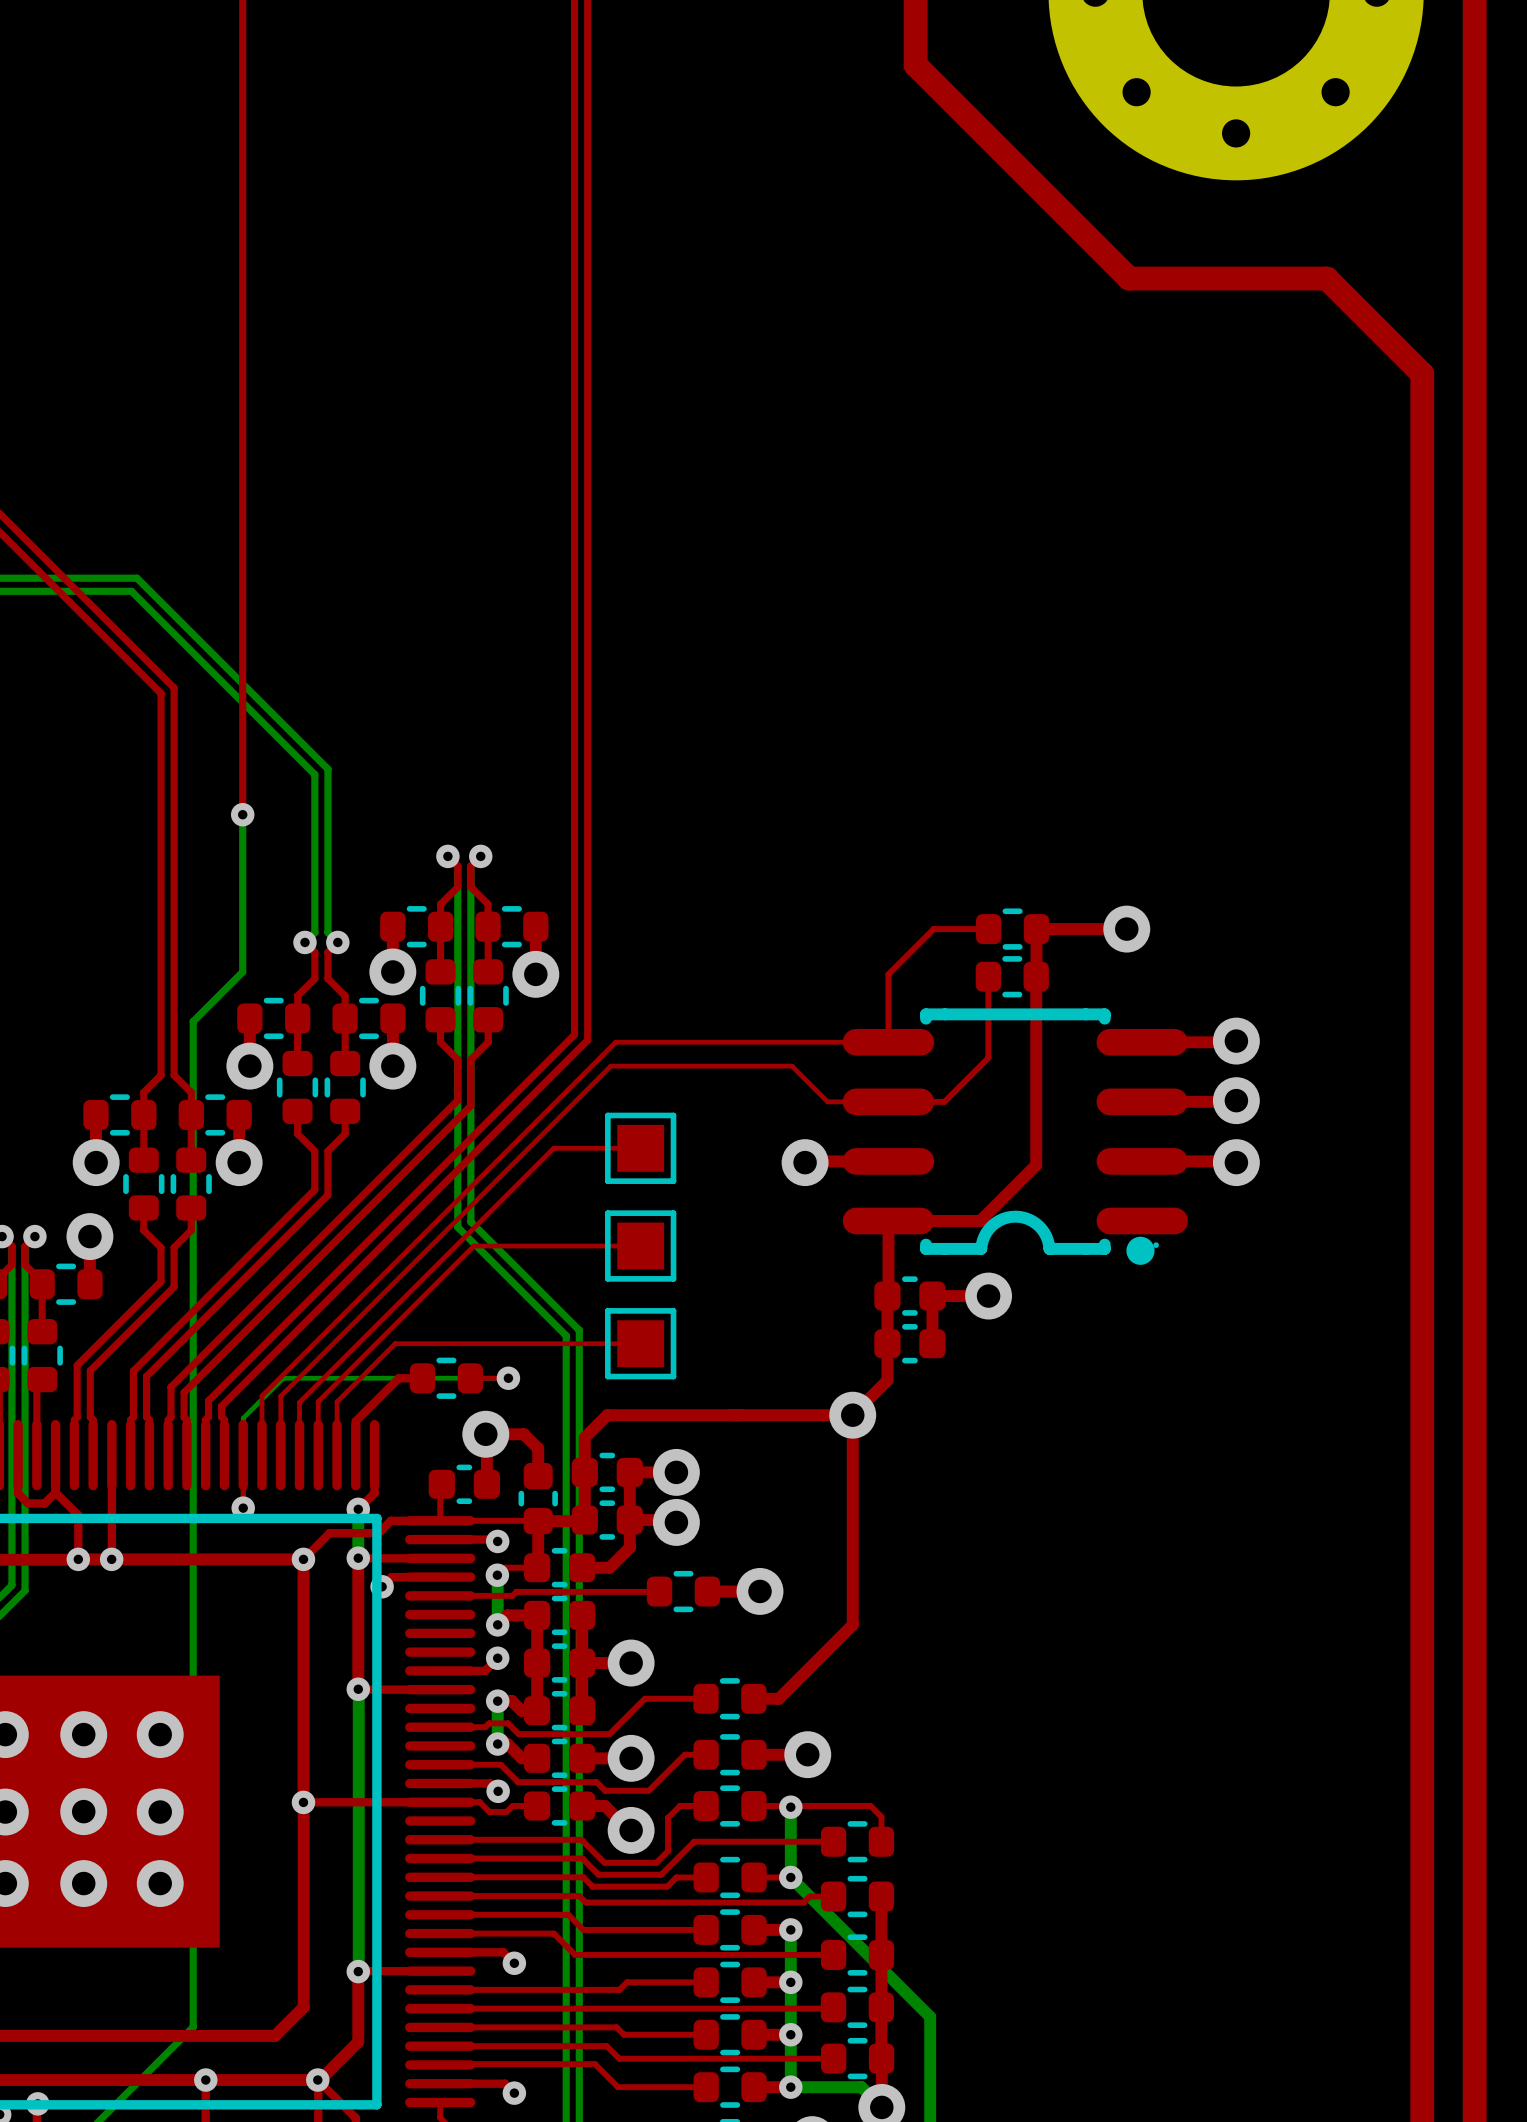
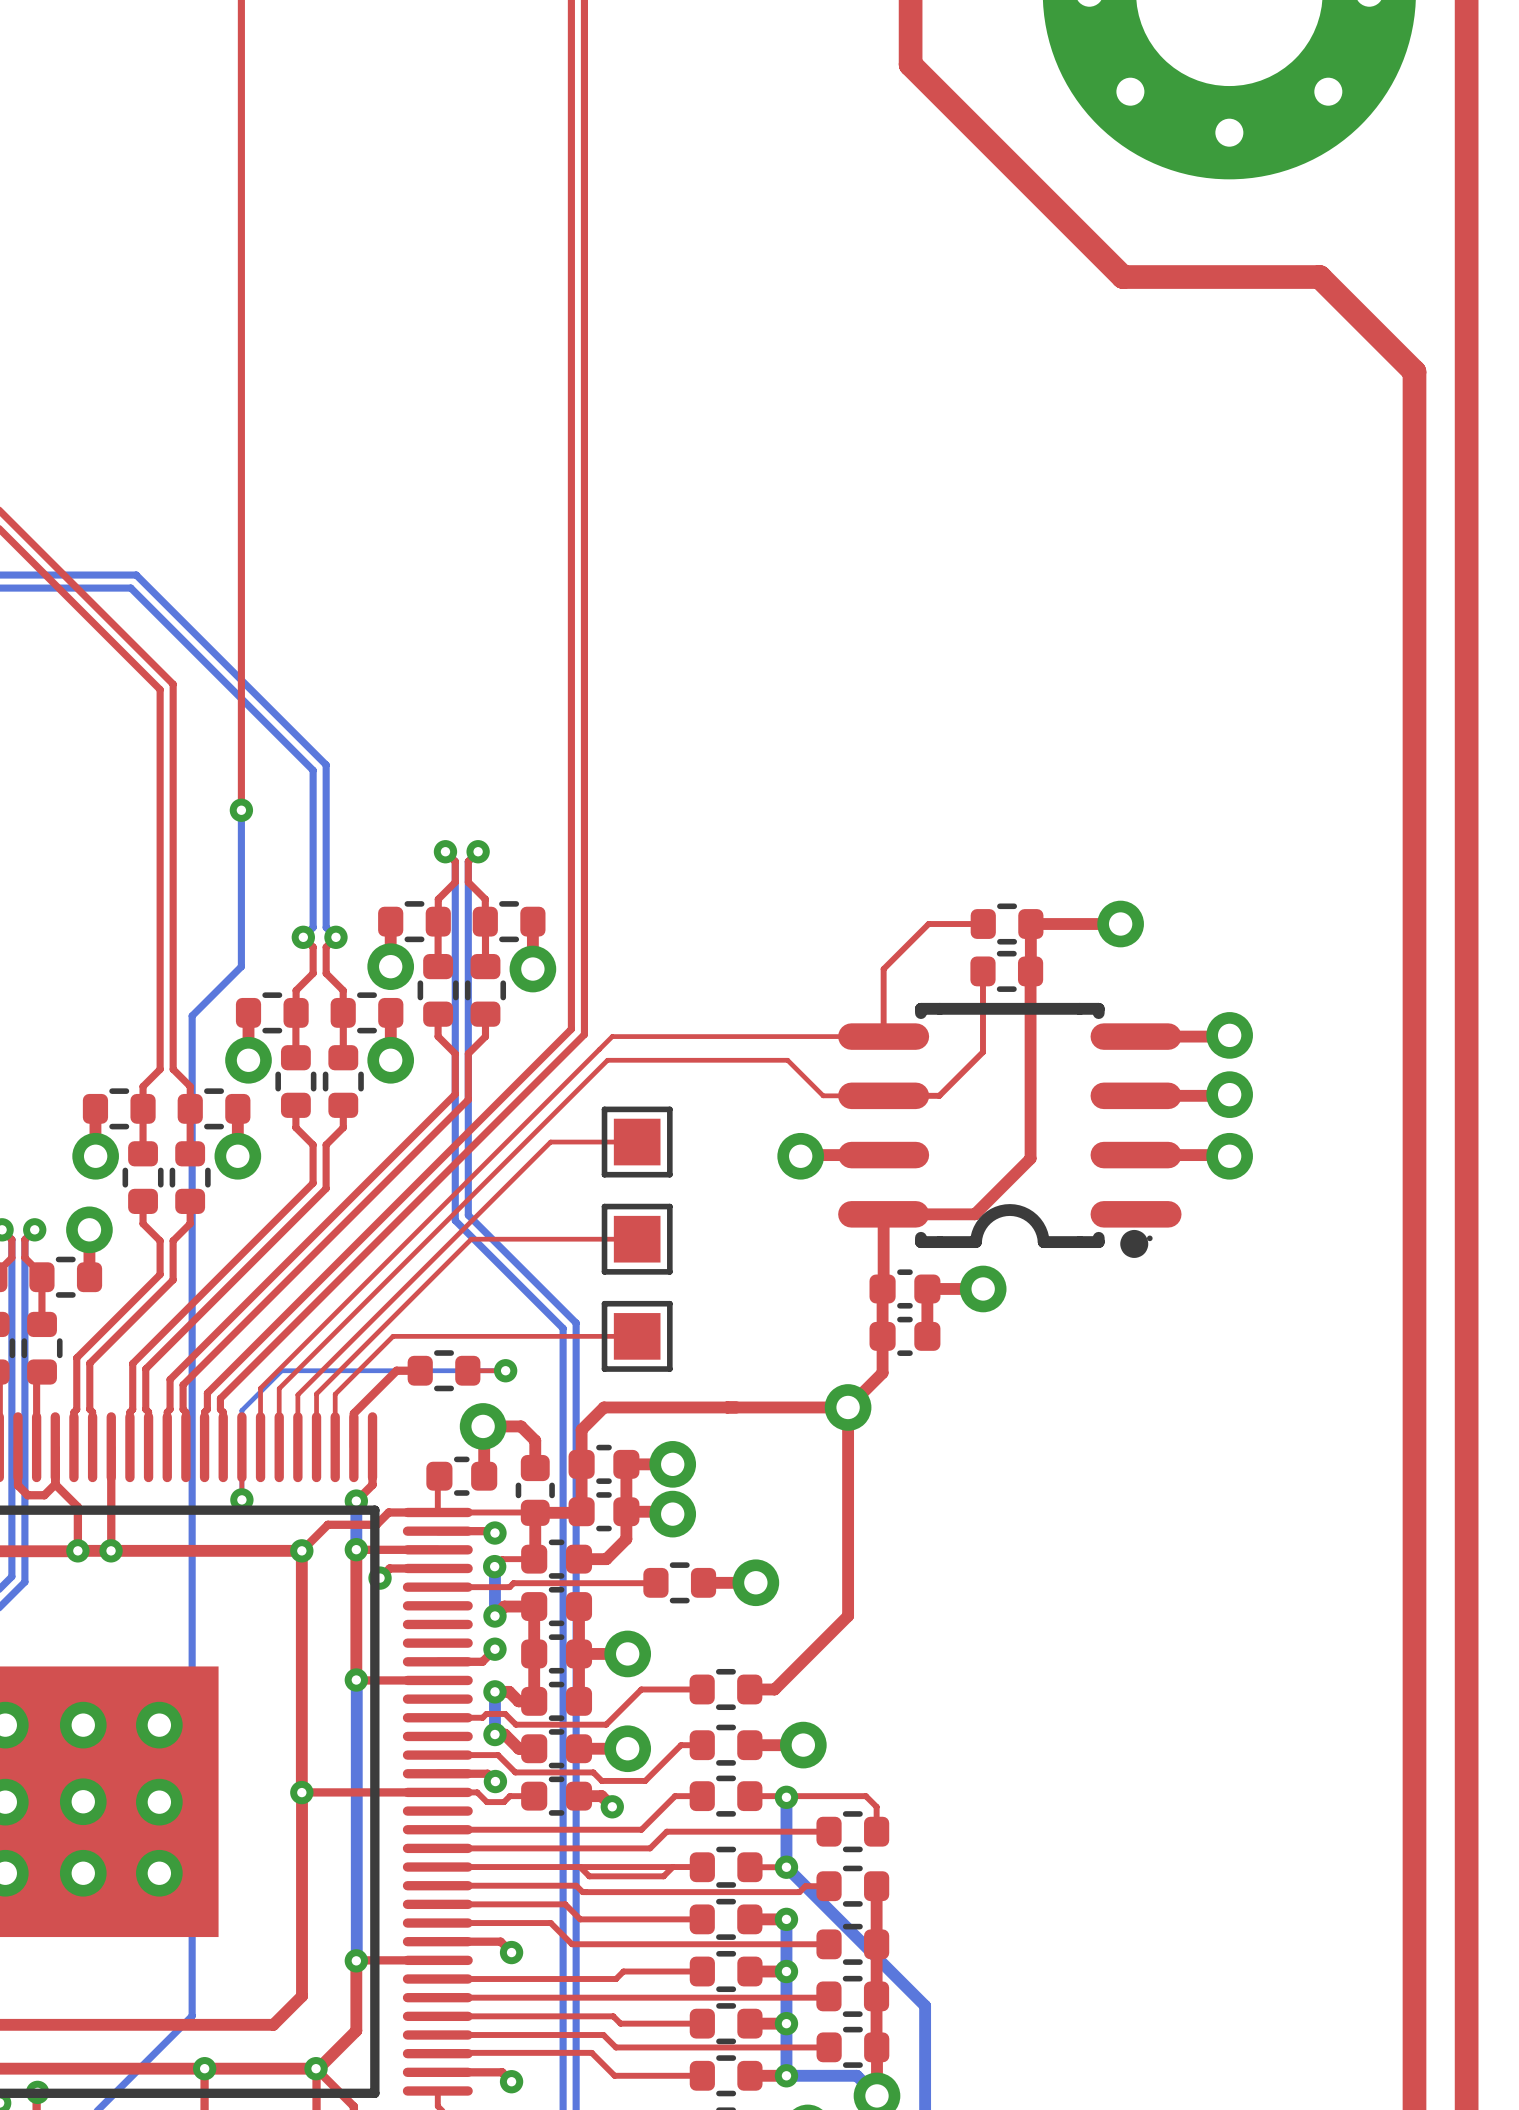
top track: (679, 1805) (668, 1817) (668, 1851) (656, 1862) (604, 1862) (581, 1839) -> (676, 1796) (641, 1829) (578, 1829)
via size: [607, 1806, 655, 1854] -> [600, 1795, 624, 1819]
top track: (694, 1841) (661, 1874) (598, 1874) (582, 1858) -> (690, 1831) (666, 1831) (650, 1848) (579, 1848)

